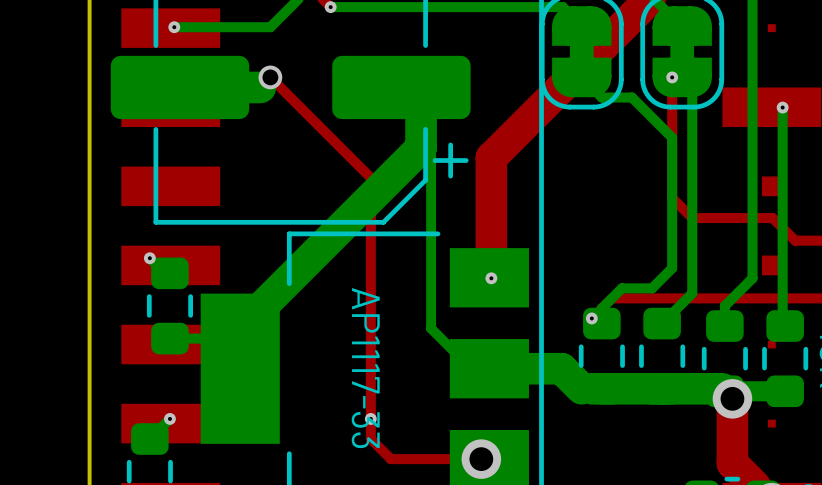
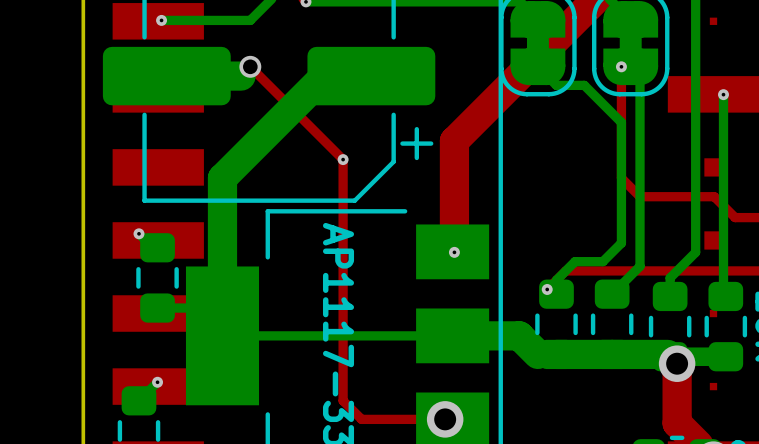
bottom track: none -> (371, 76) (324, 76) (222, 178) (222, 298)
via: none -> (343, 159)
bottom track: (240, 328) (421, 147) (421, 107) (401, 87) (431, 117) (431, 328) (471, 368) -> (222, 335) (435, 335)
via: (370, 418) -> none

